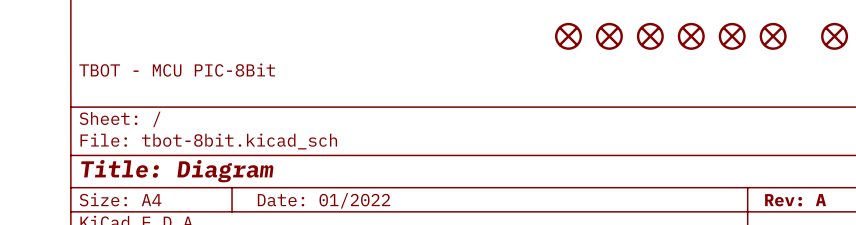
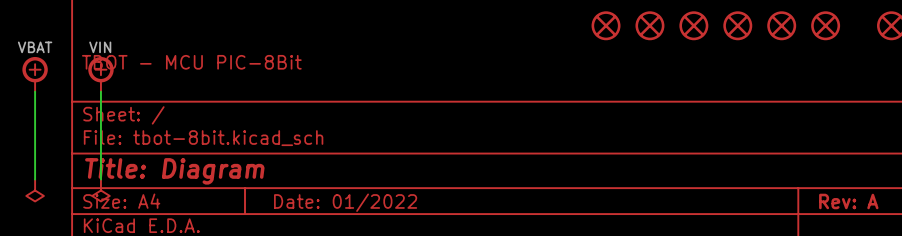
power symbol: none -> (35, 74)
power symbol: none -> (100, 74)
wire: none -> (35, 91) (35, 179)
wire: none -> (100, 91) (100, 179)
power symbol: none -> (35, 190)
power symbol: none -> (100, 190)

